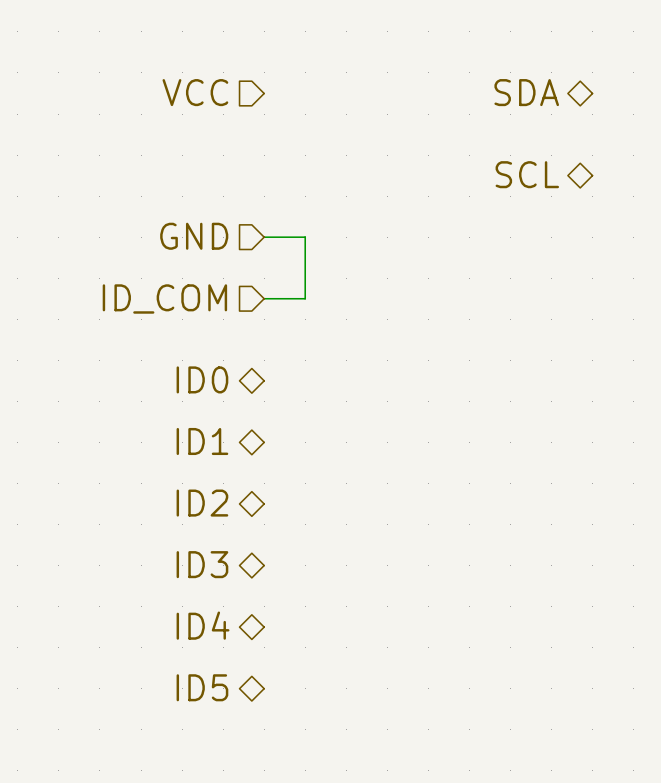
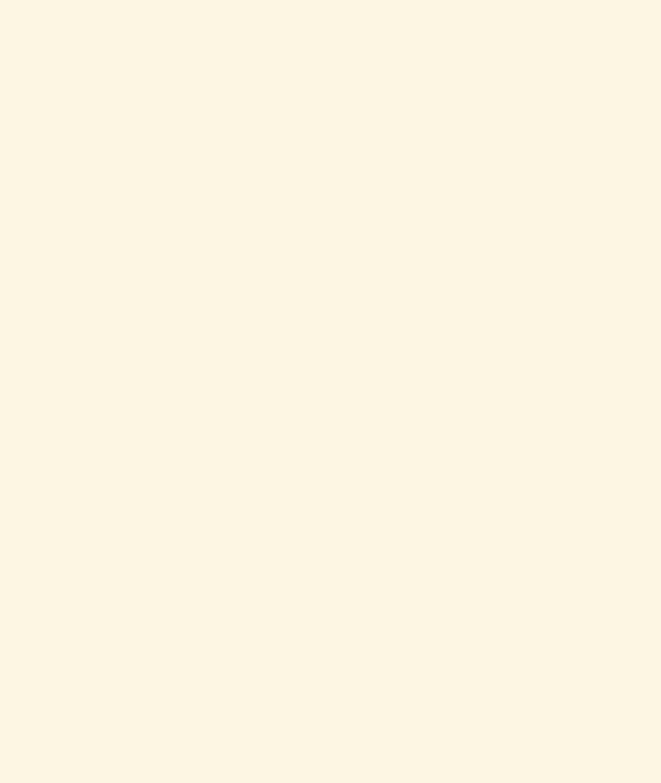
hierarchical label: VCC (195, 92) -> none
hierarchical label: SDA (526, 92) -> none
hierarchical label: SCL (527, 174) -> none
hierarchical label: GND (194, 236) -> none
wire: (264, 237) (305, 237) (305, 298) (264, 298) -> none
hierarchical label: ID_COM (164, 299) -> none
hierarchical label: ID0 (202, 379) -> none
hierarchical label: ID1 (202, 441) -> none
hierarchical label: ID2 (202, 503) -> none
hierarchical label: ID3 (202, 564) -> none
hierarchical label: ID4 (203, 625) -> none
hierarchical label: ID5 (202, 687) -> none

